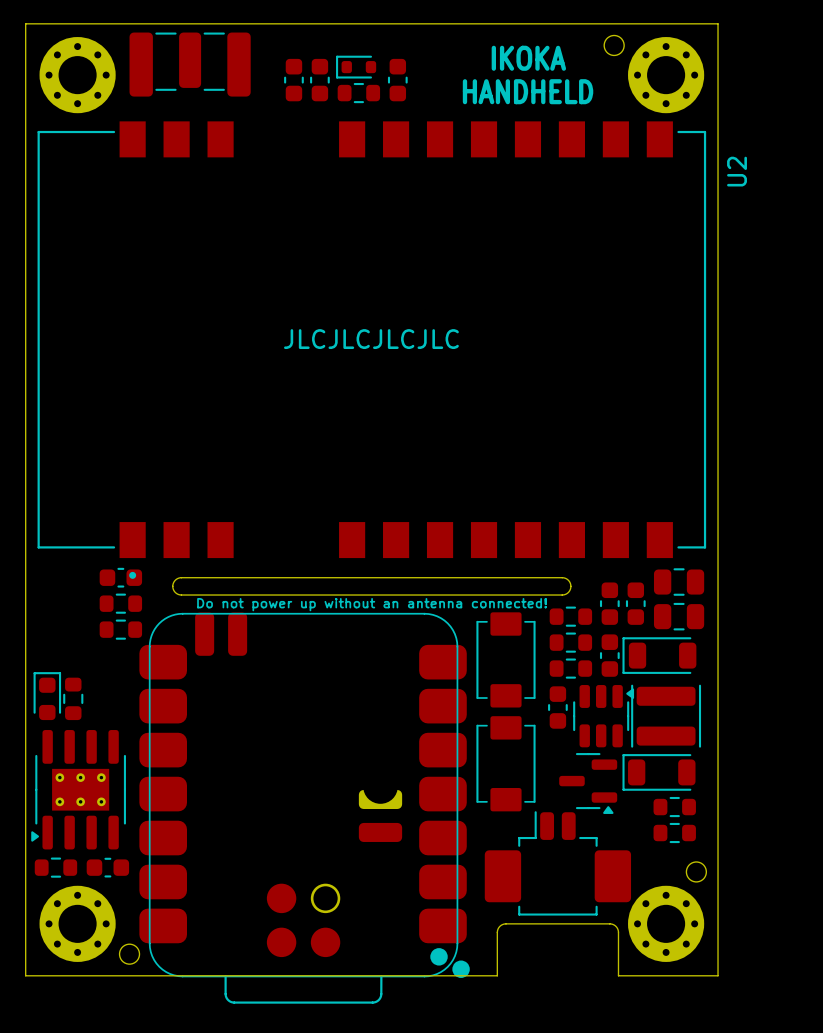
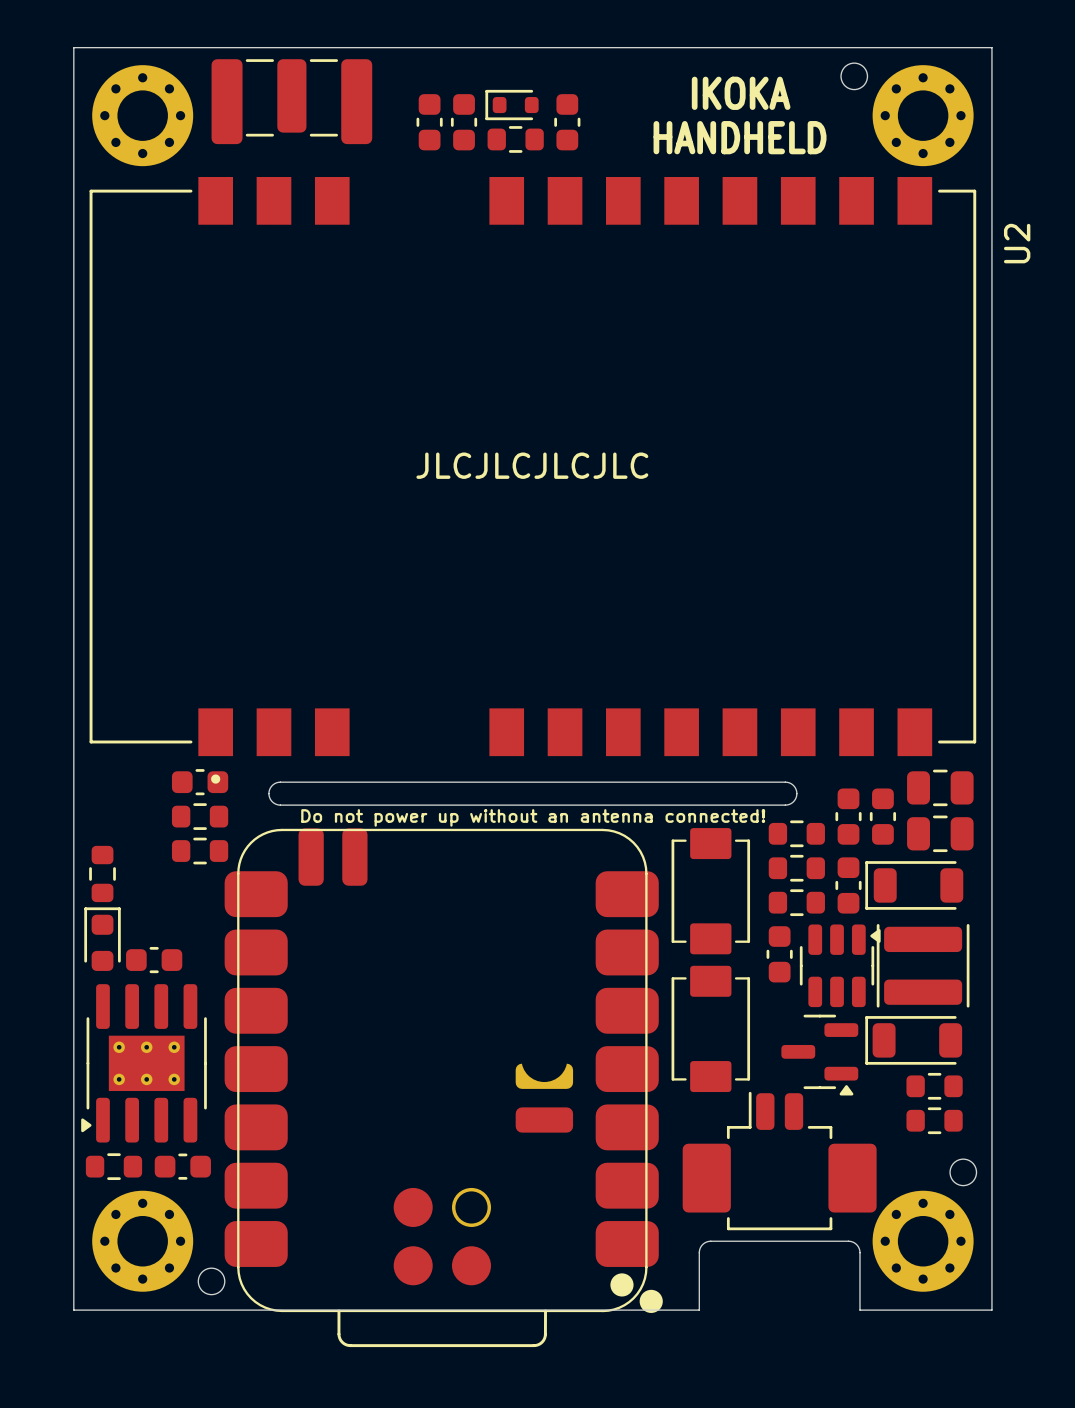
part position: (73, 698) -> (102, 873)
part: none -> (154, 960)

